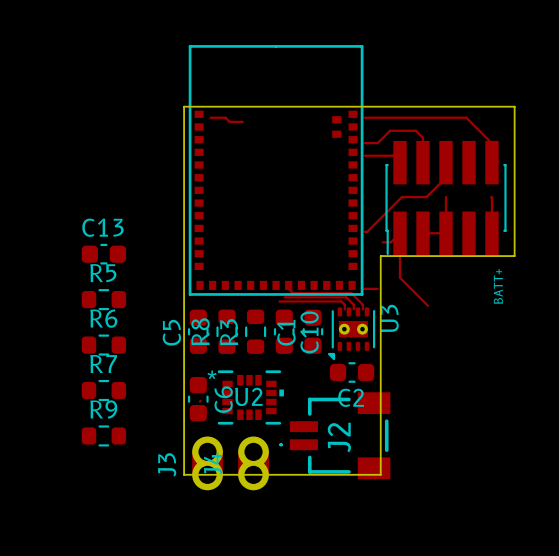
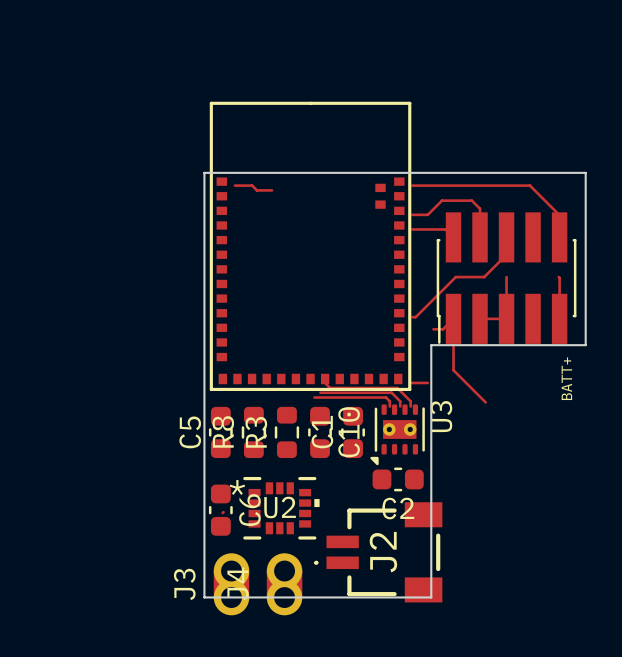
C13: (103, 254) -> none
R5: (103, 299) -> none
R6: (103, 345) -> none
R7: (103, 390) -> none
R9: (103, 435) -> none

